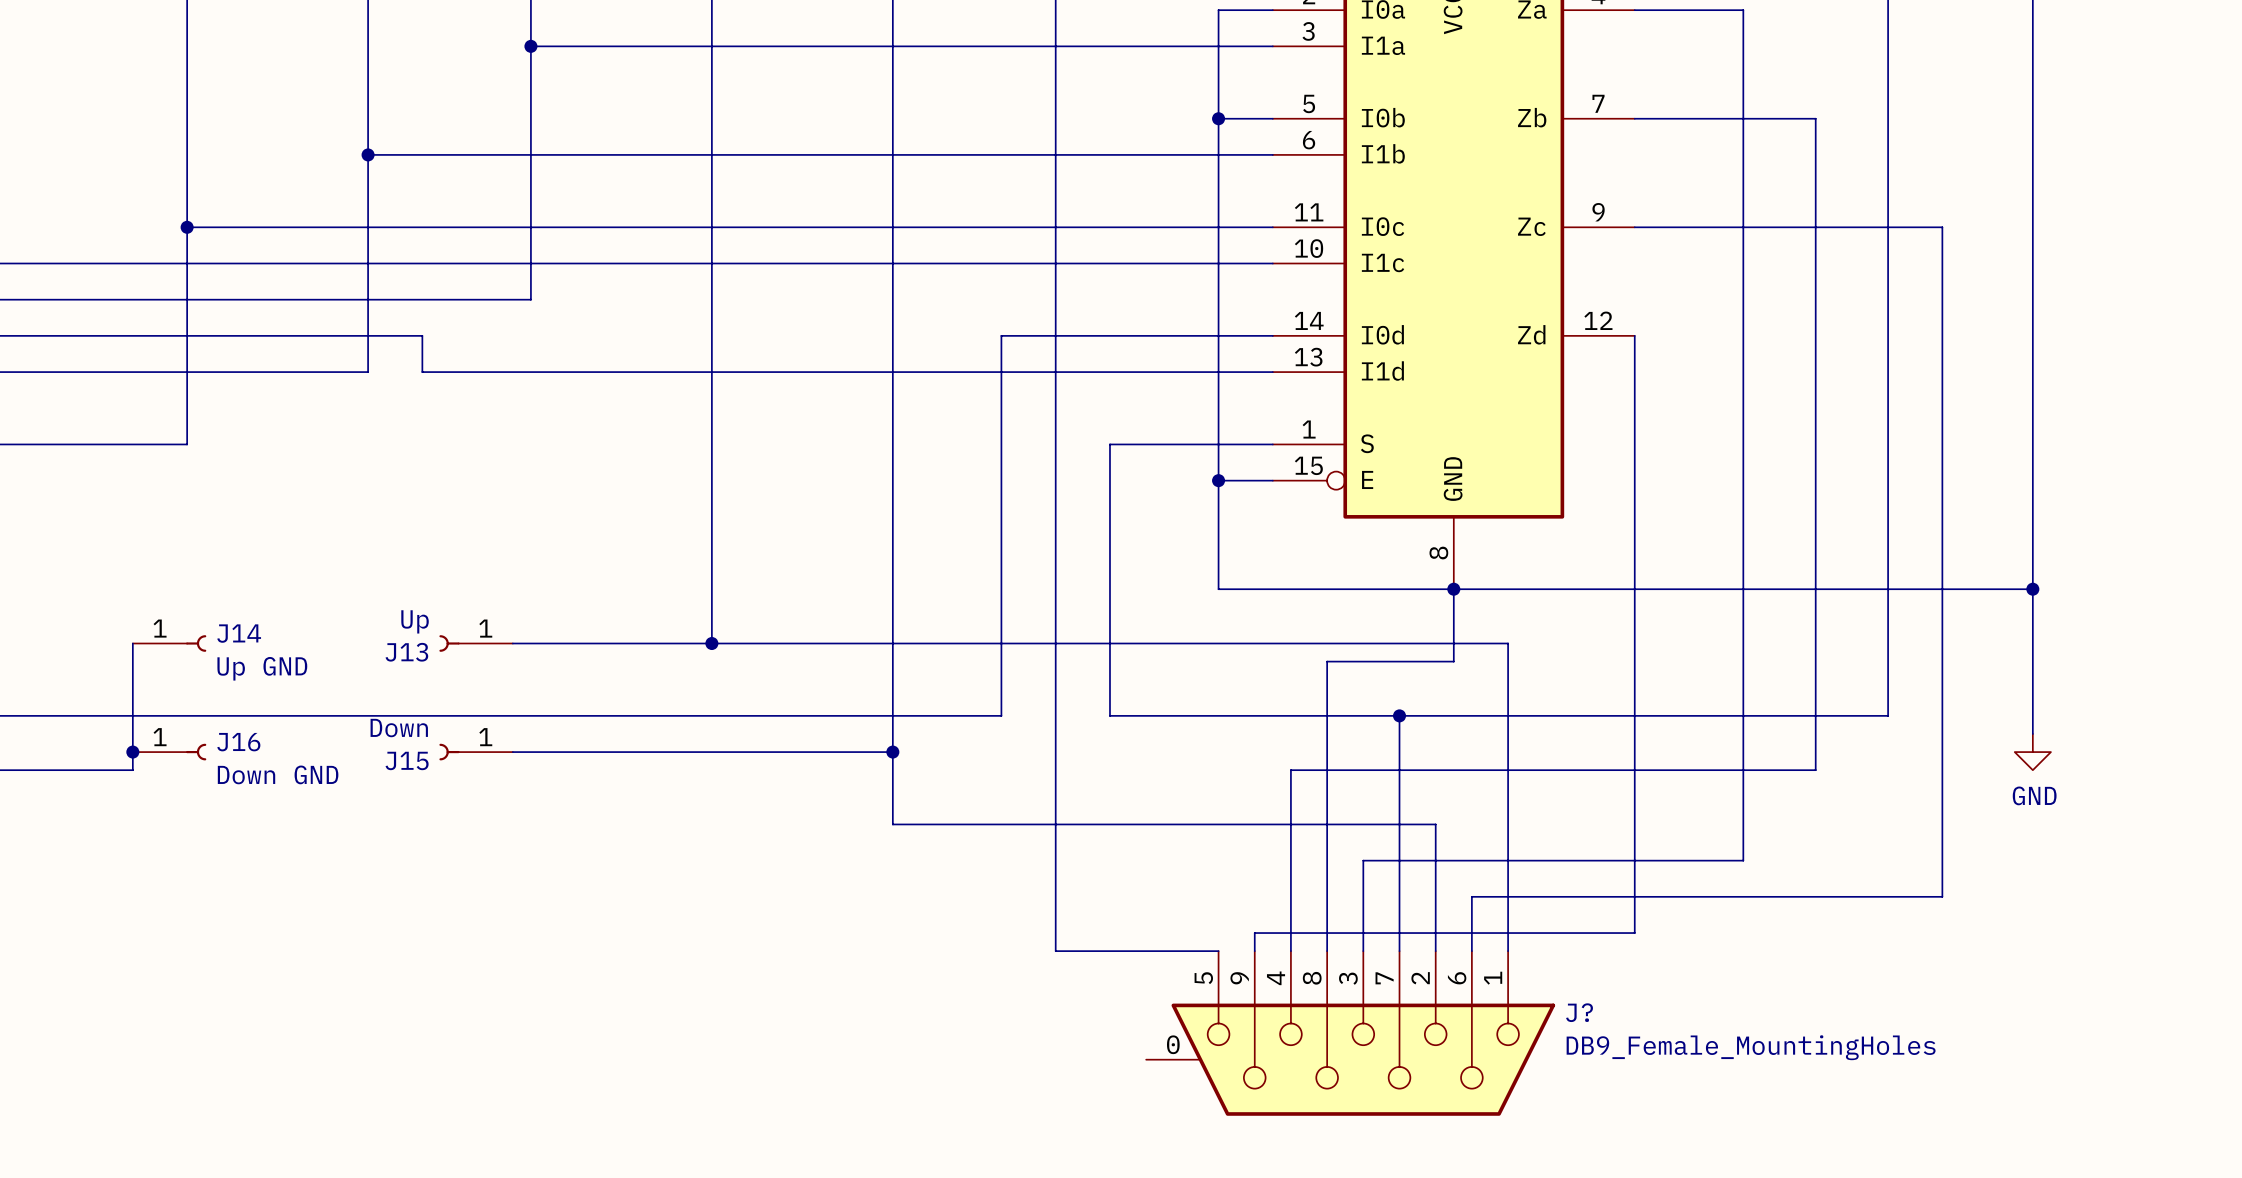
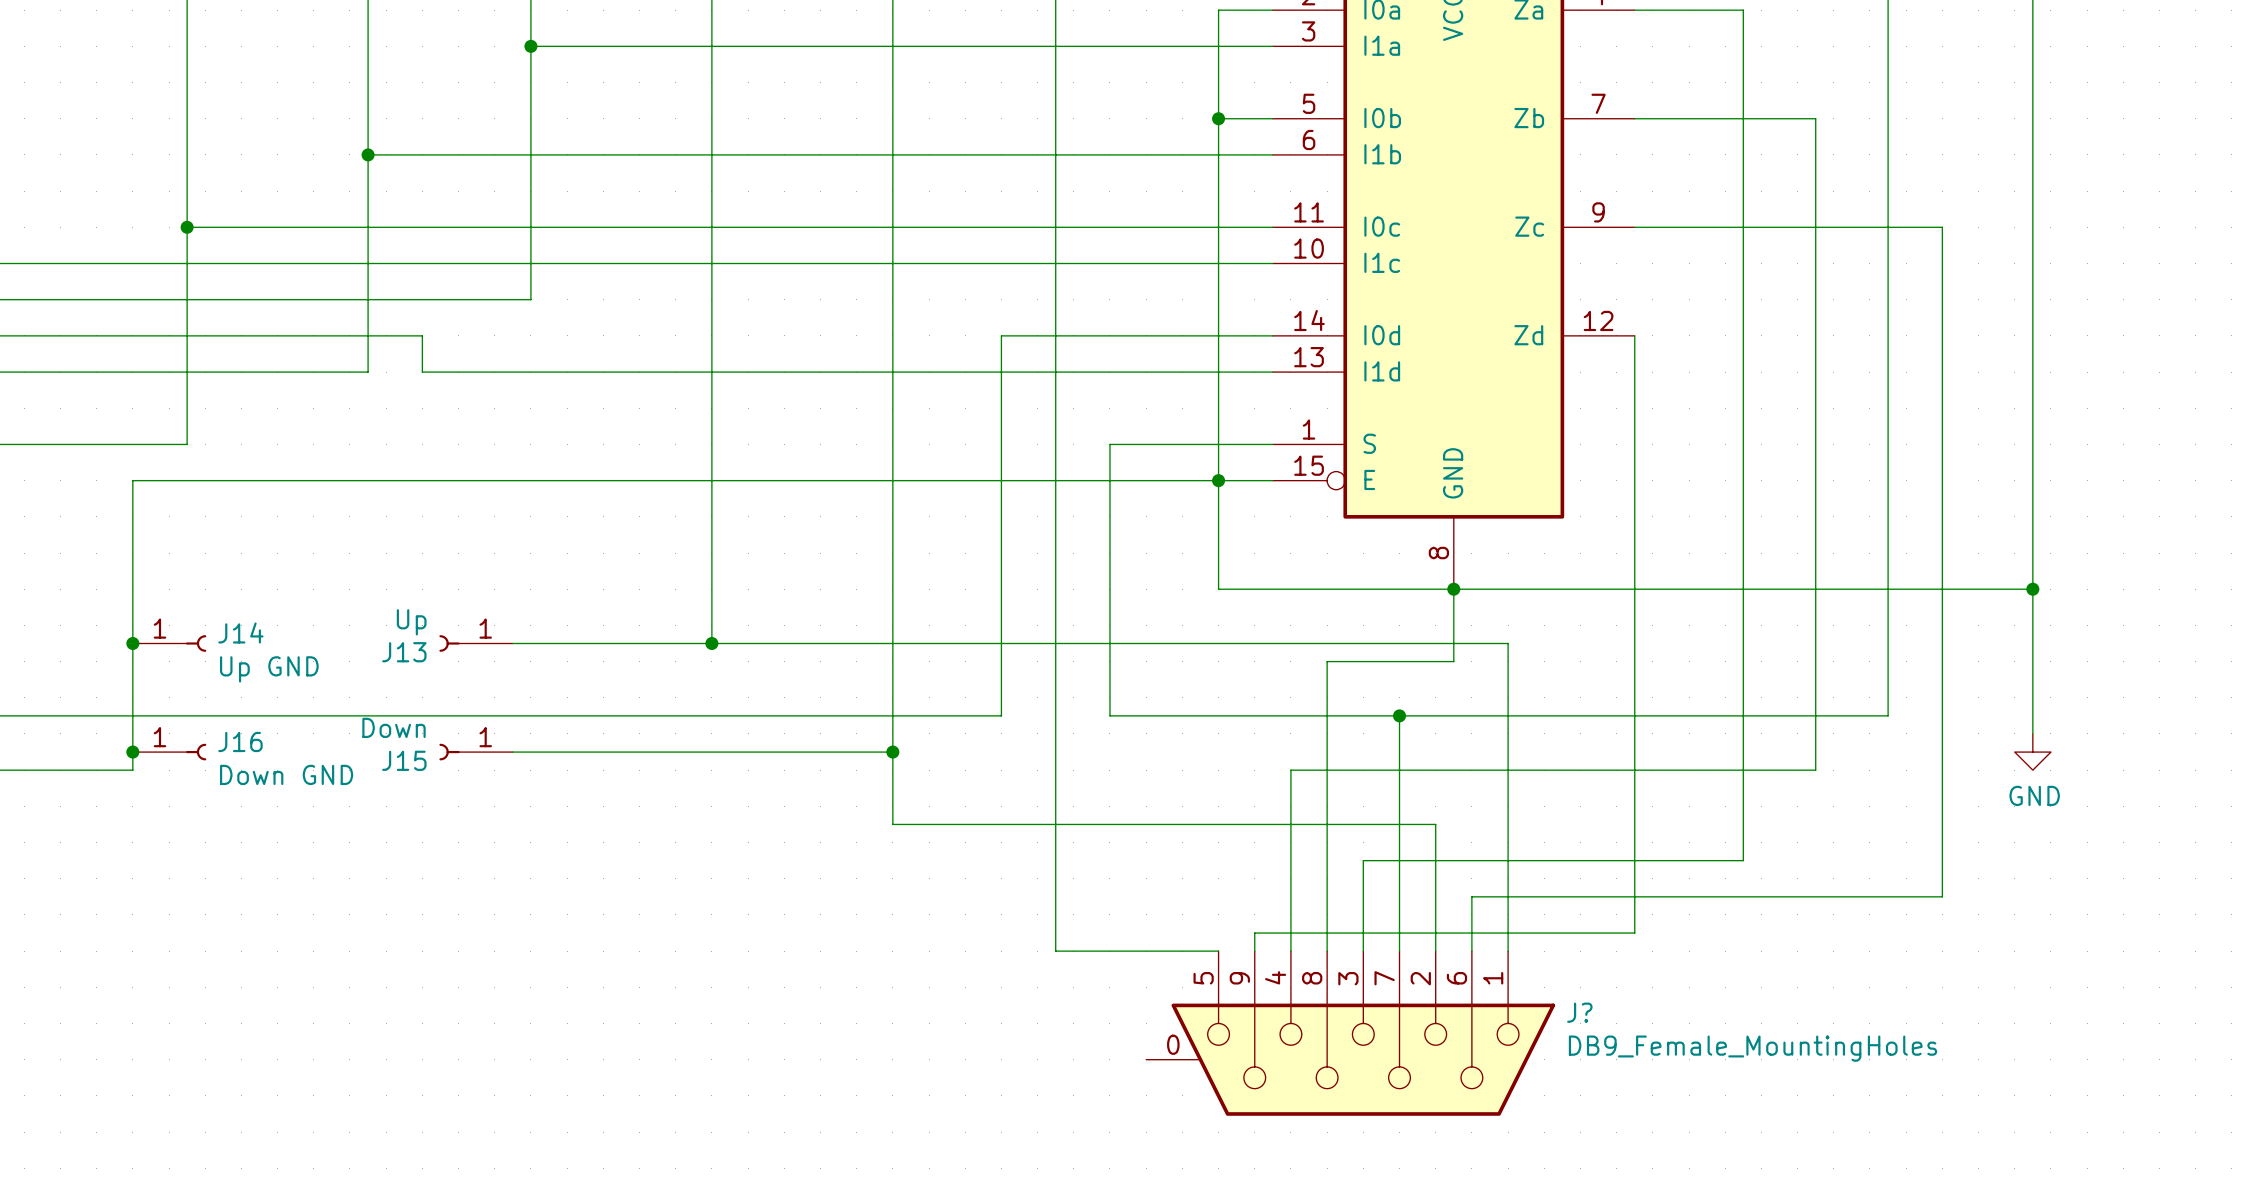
wire: none -> (1218, 480) (132, 480) (132, 643)
junction: none -> (132, 643)

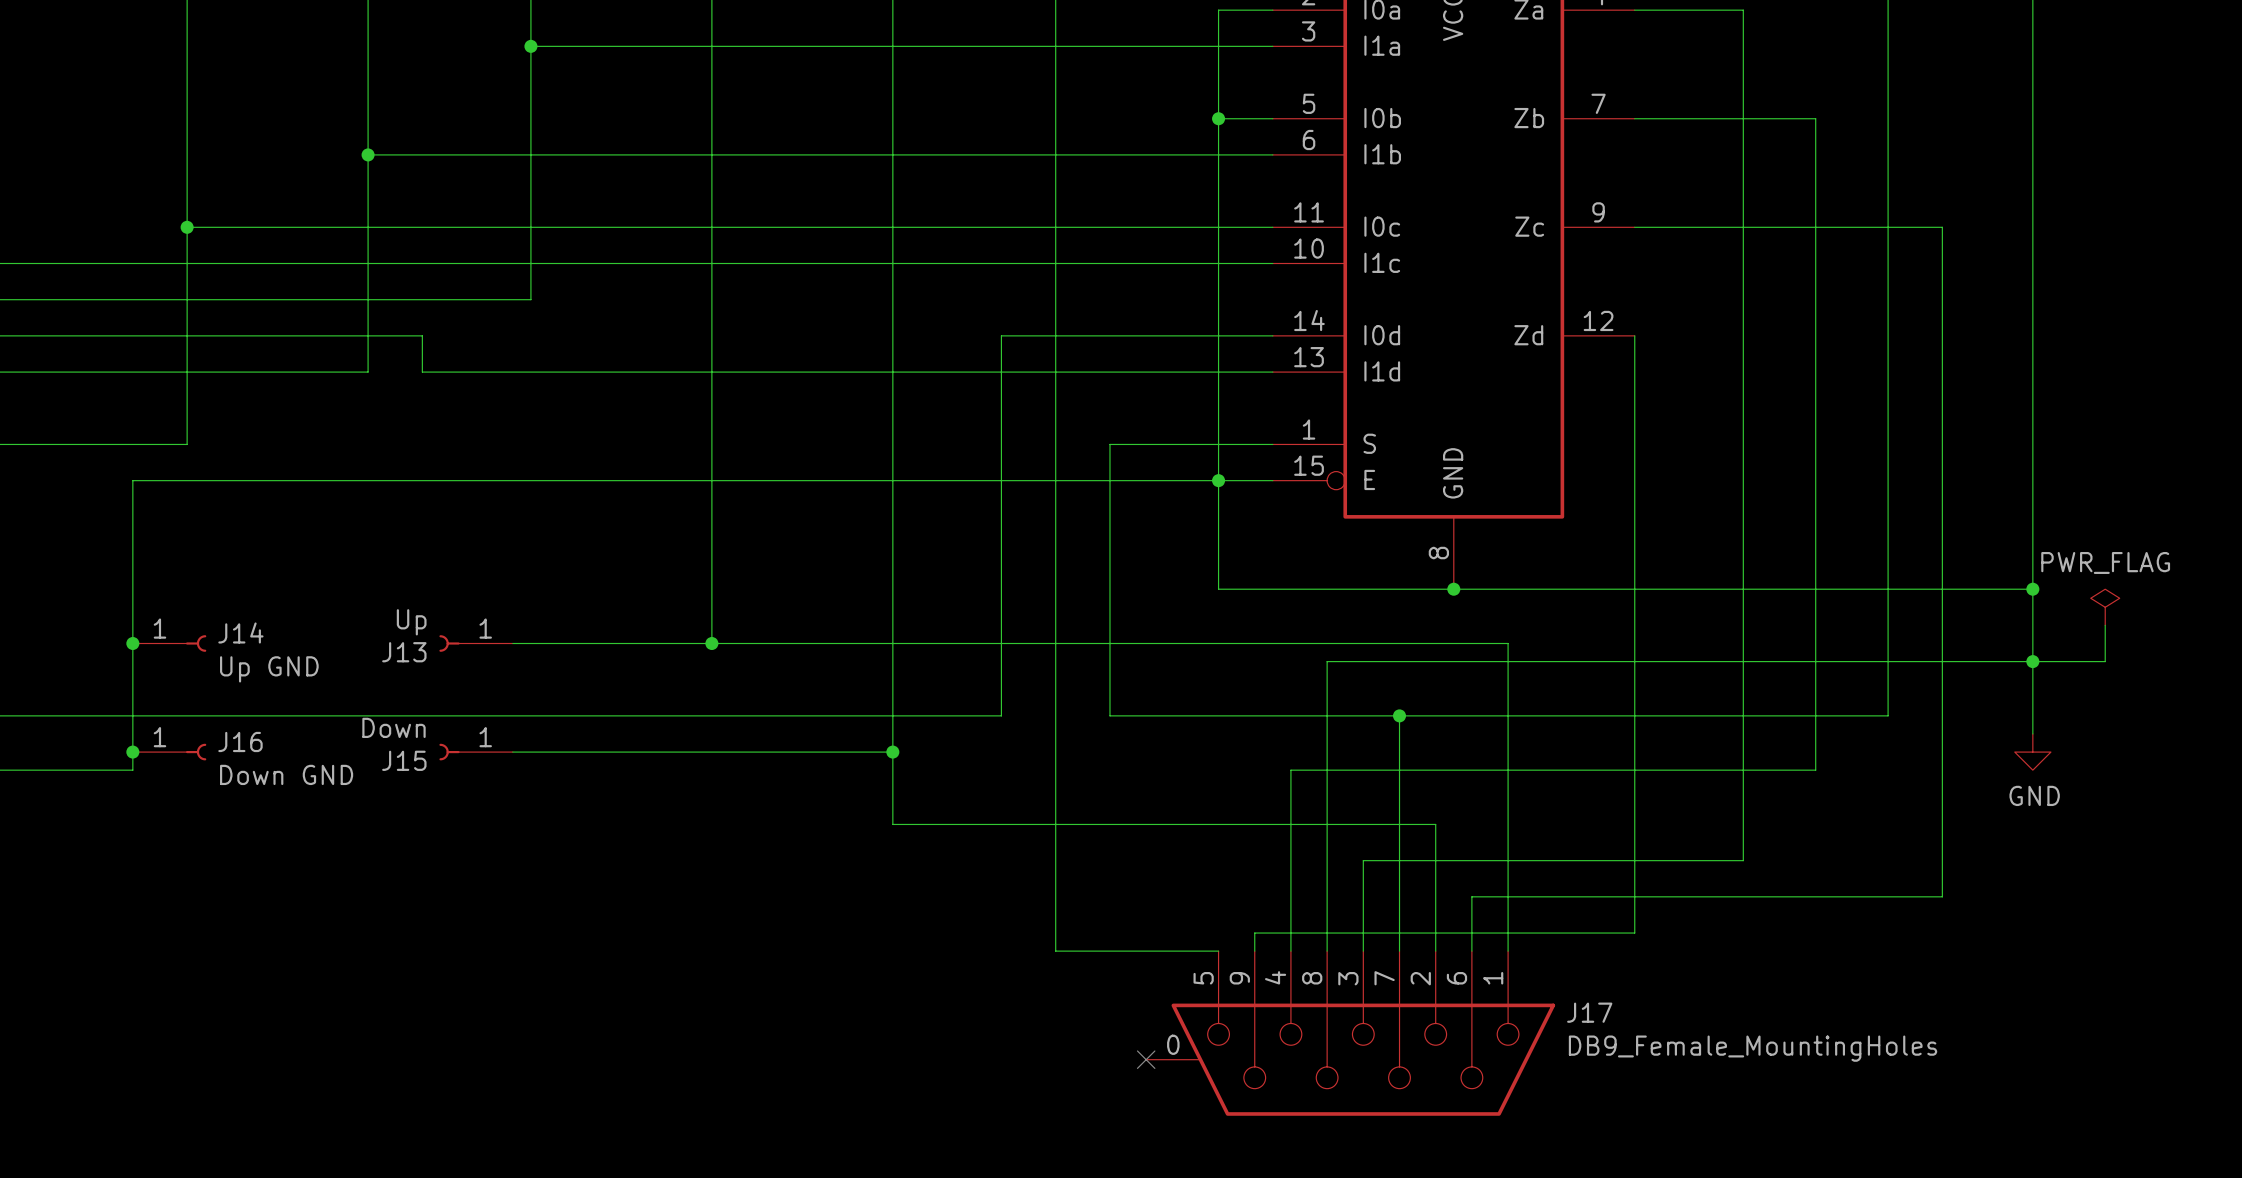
wire: (1453, 589) (1453, 661) -> (2105, 625) (2105, 661) (1453, 661)
power symbol: none -> PWR_FLAG (2105, 607)
junction: none -> (2032, 661)
J? name: J? (1579, 1012) -> J17 (1589, 1012)
no-connect mark: none -> (1146, 1059)

